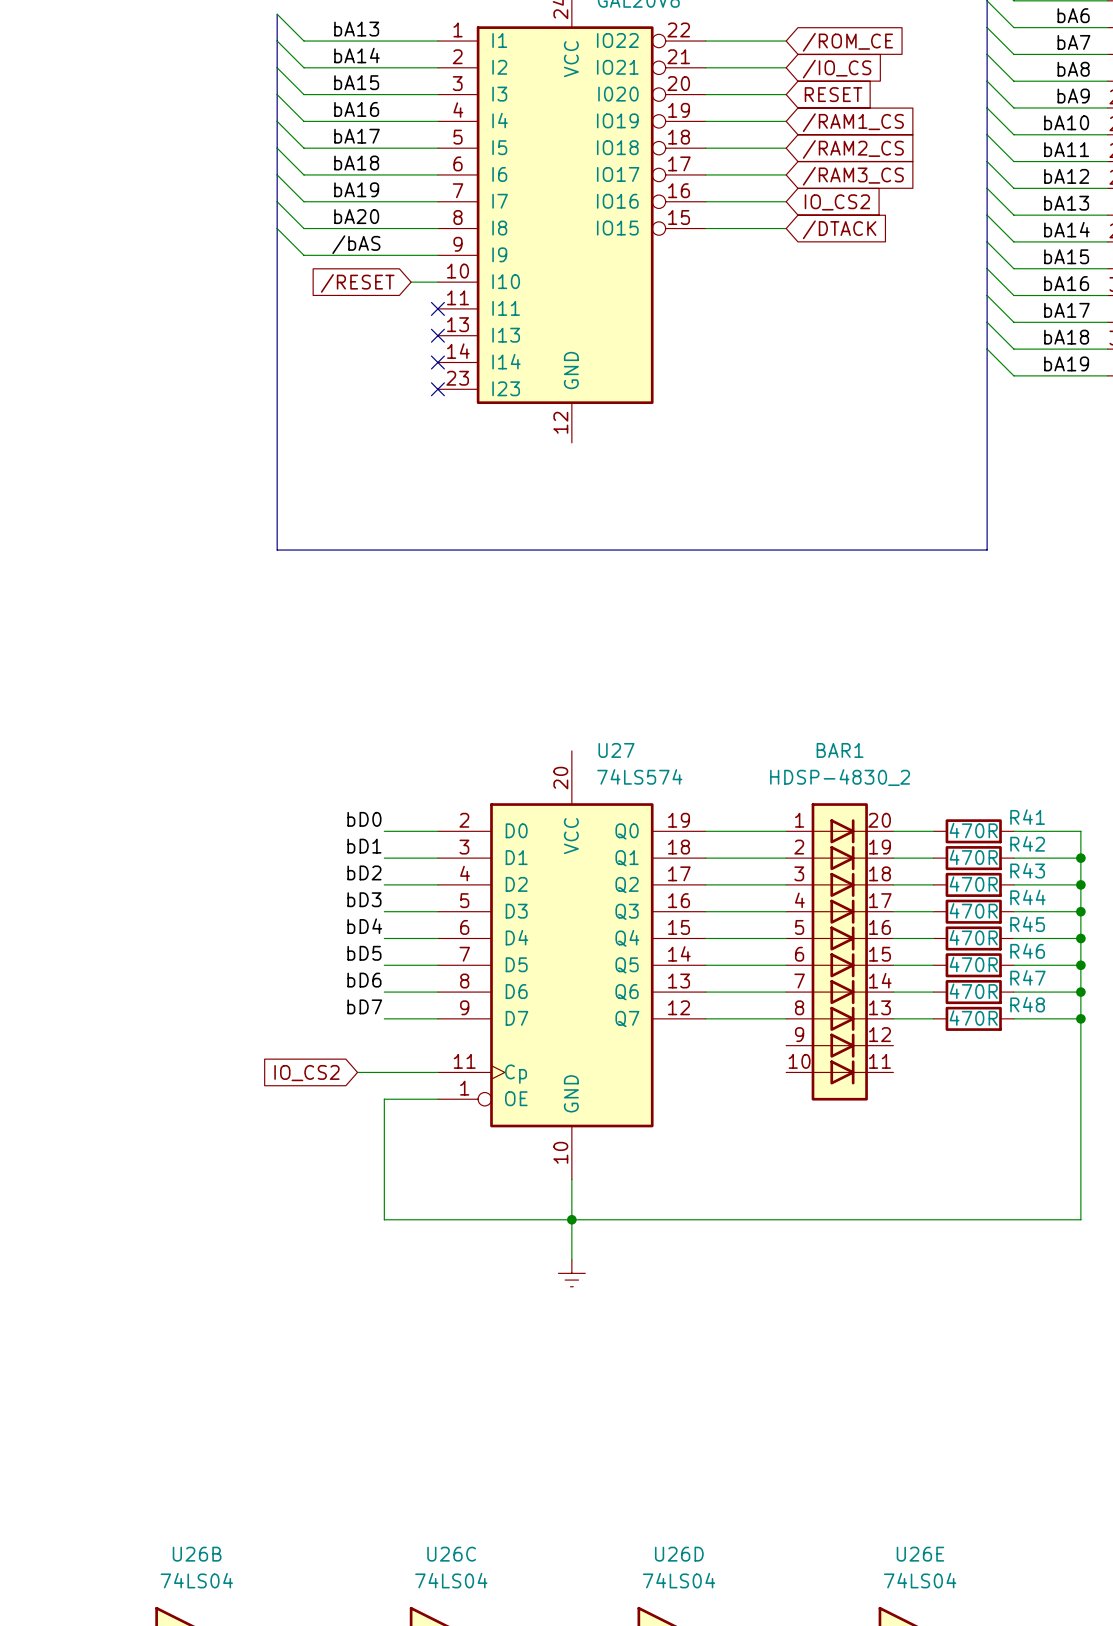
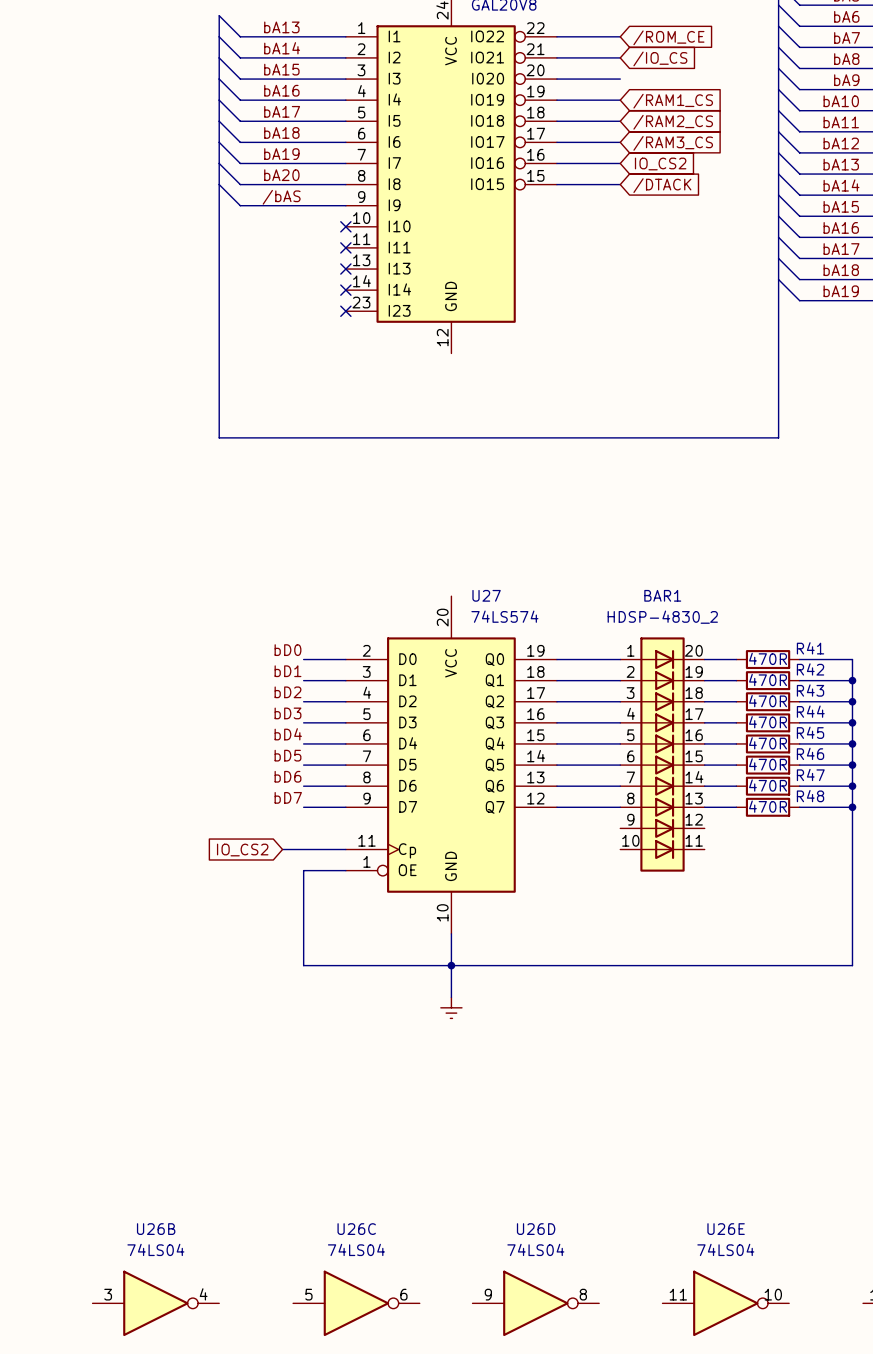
global label: RESET (833, 94) -> none
wire: (411, 282) (437, 282) -> none
no-connect mark: none -> (345, 226)
global label: /RESET (357, 283) -> none

